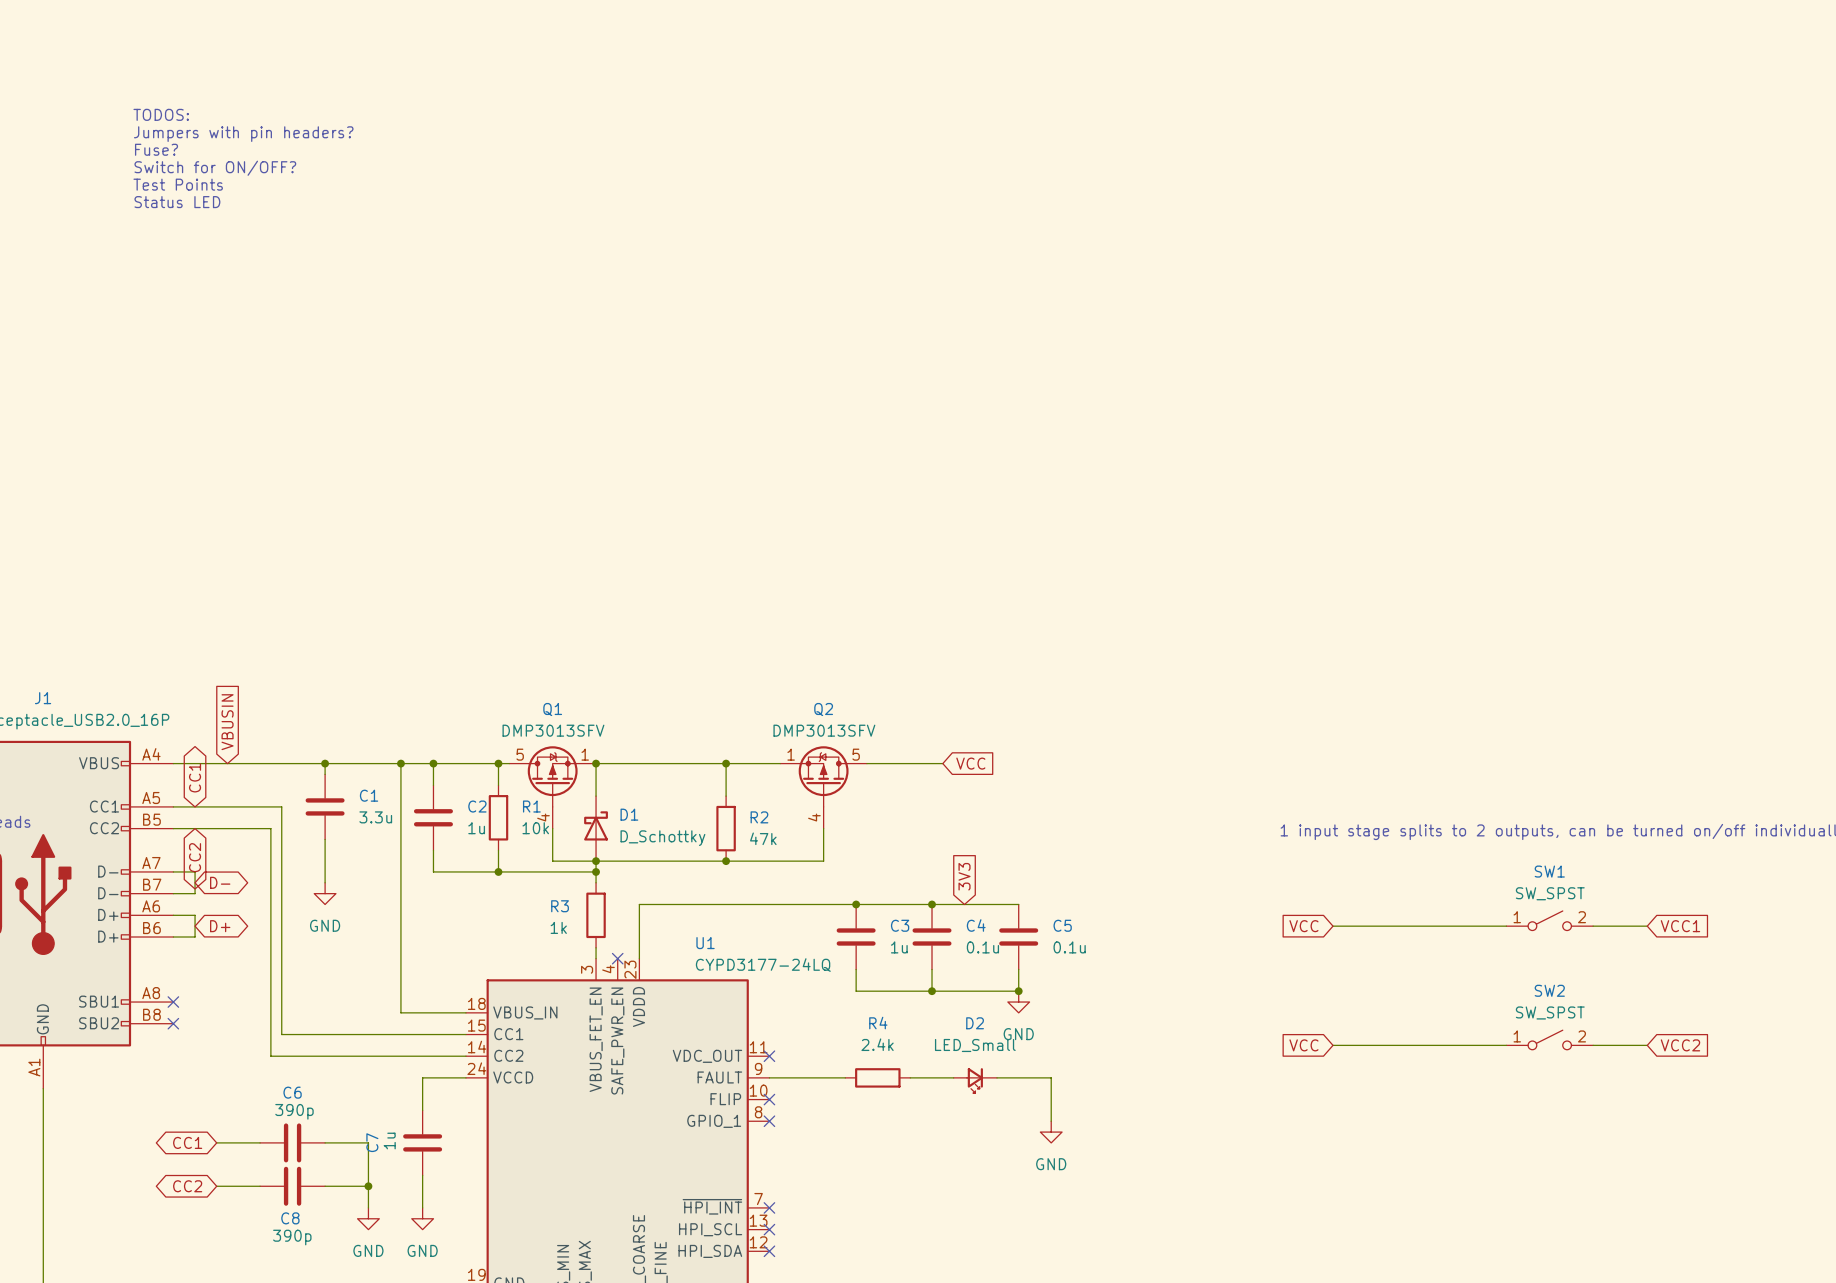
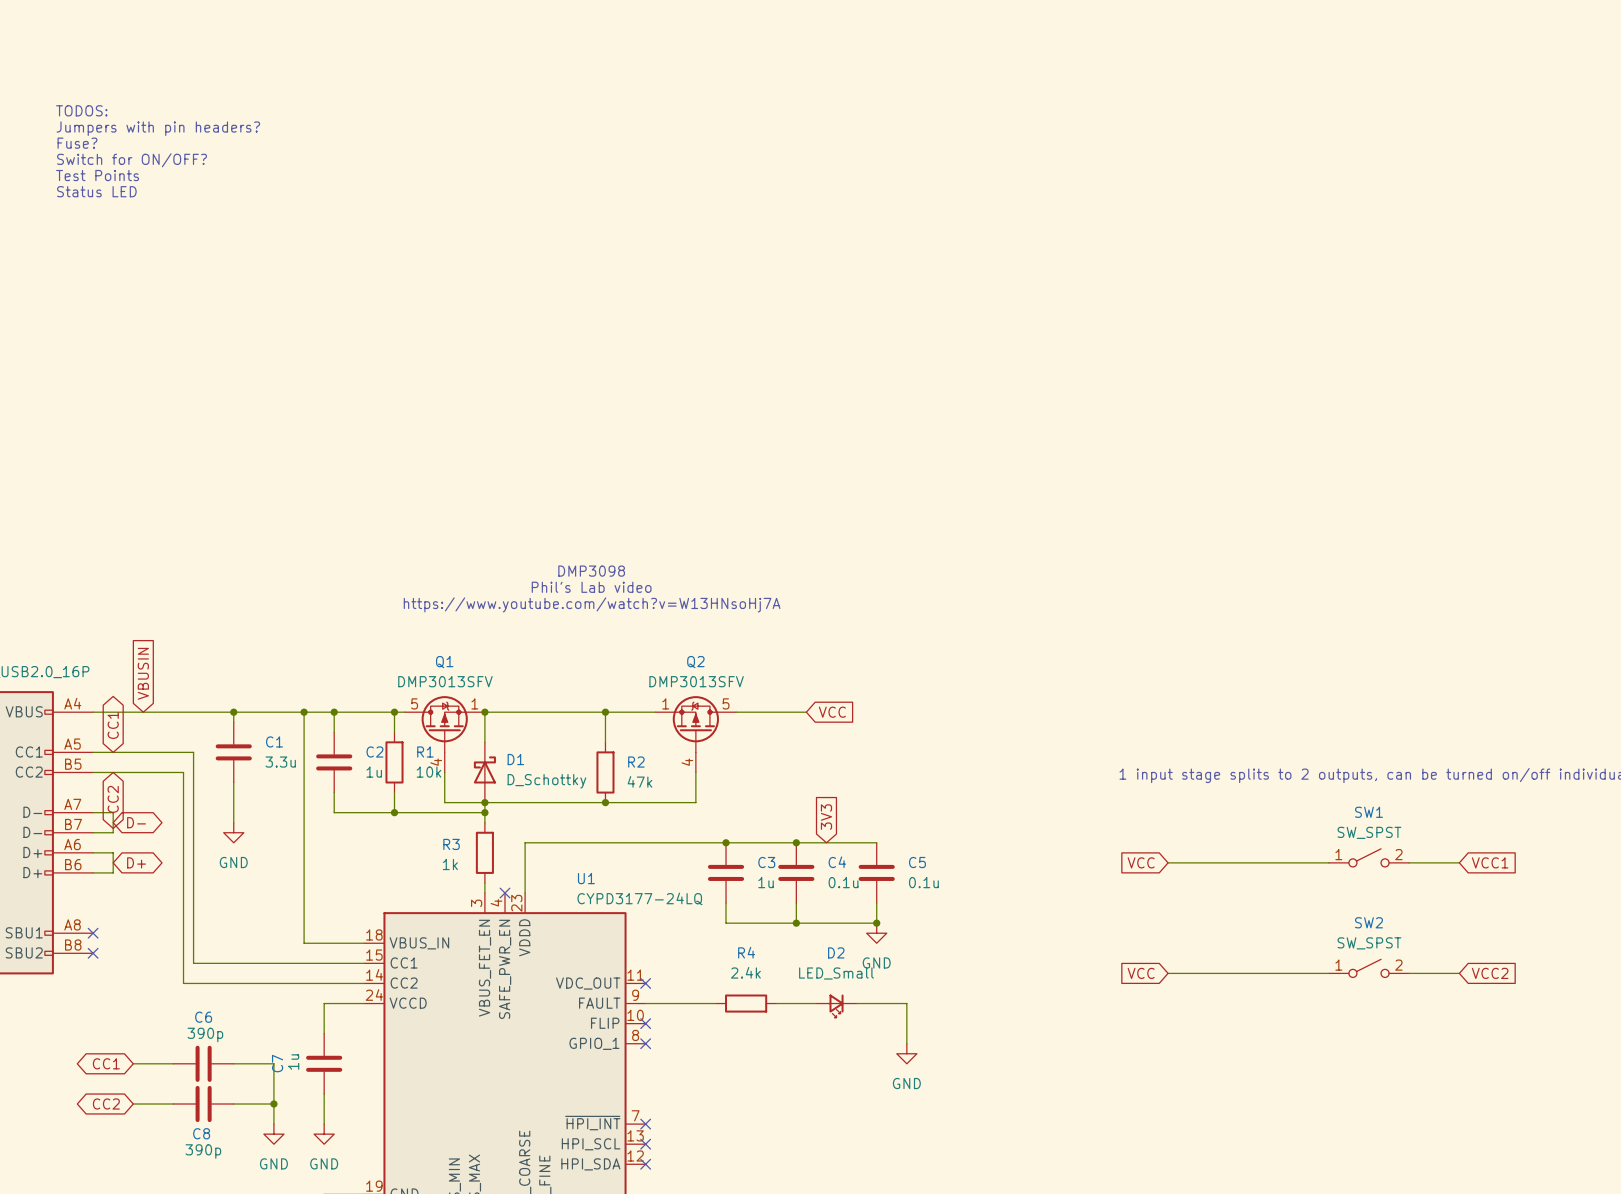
text: none -> DMP3098 (591, 571)
text: none -> Phil's Lab video (591, 587)
text: none -> https://www.youtube.com/watch?v=W13HNsoHj7A (592, 604)

